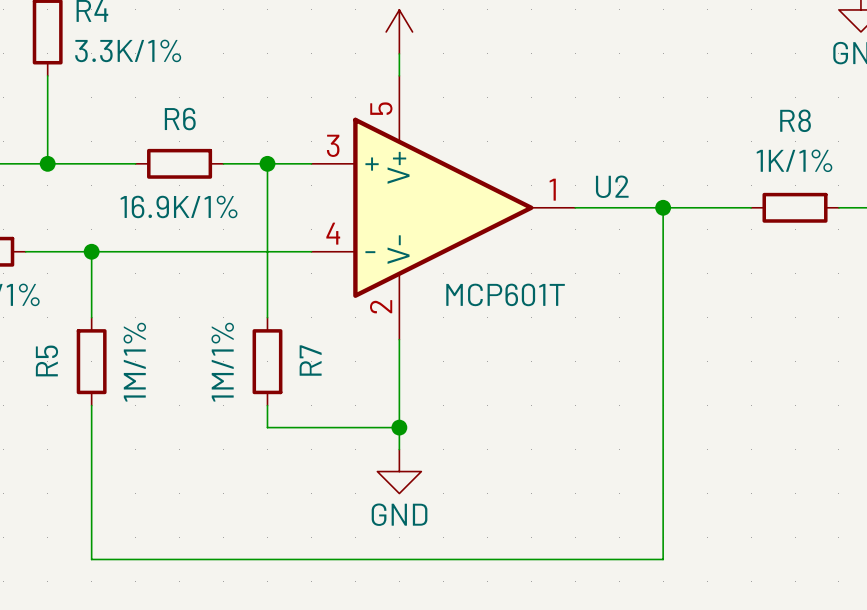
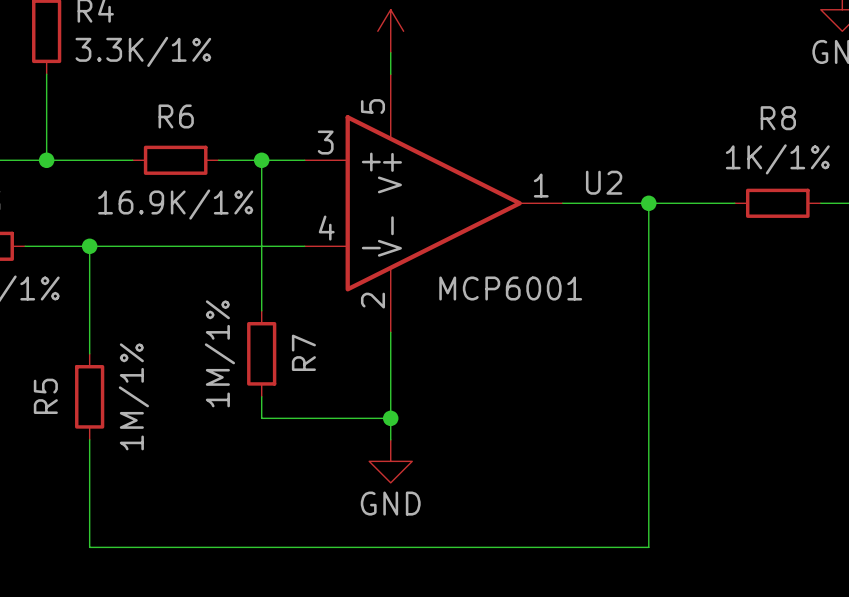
U2 value: MCP601T (505, 294) -> MCP6001 (510, 288)
R5 position: (91, 361) -> (89, 396)
wire: (91, 405) (91, 449) -> (89, 310) (89, 353)

